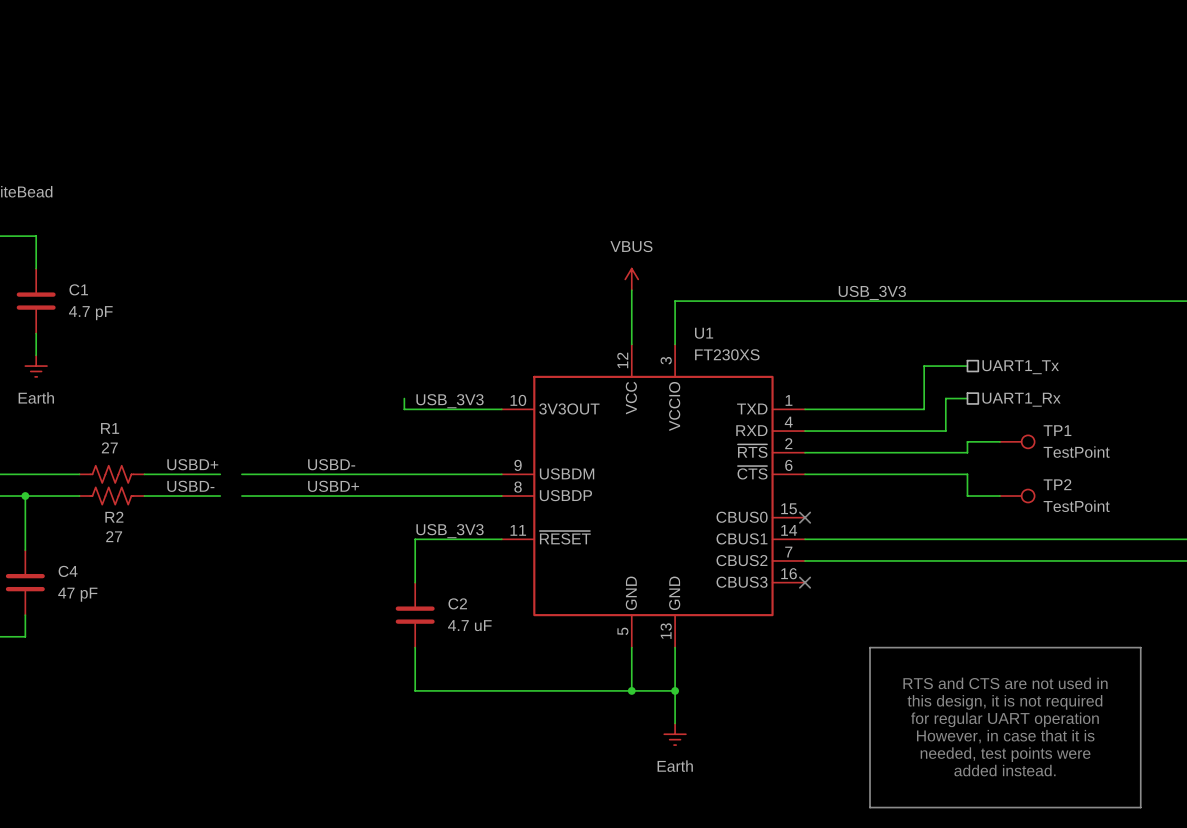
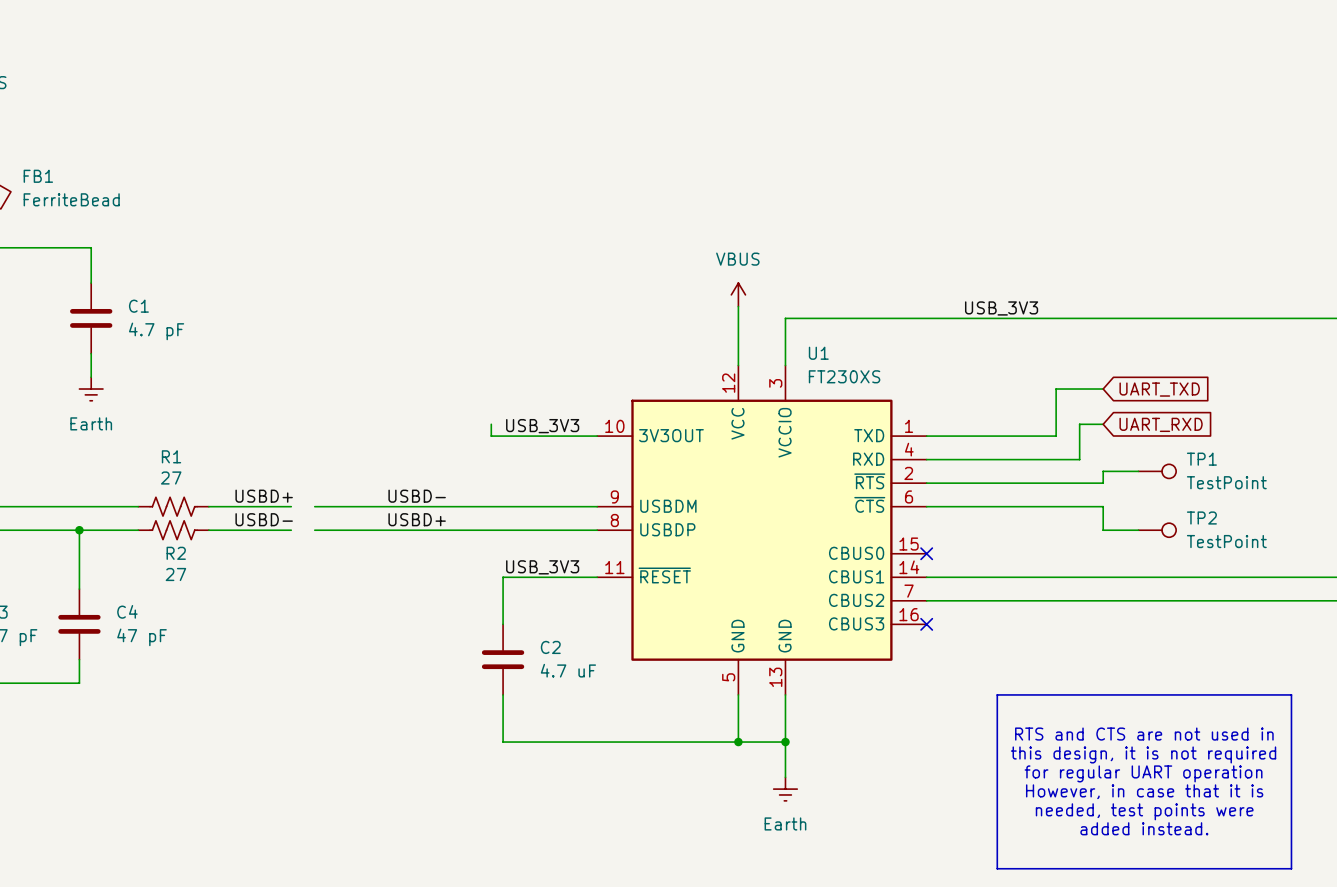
hierarchical label: UART1_Tx (1020, 367) -> none
global label: none -> UART_TXD (1159, 389)
hierarchical label: UART1_Rx (1021, 399) -> none
global label: none -> UART_RXD (1161, 424)

